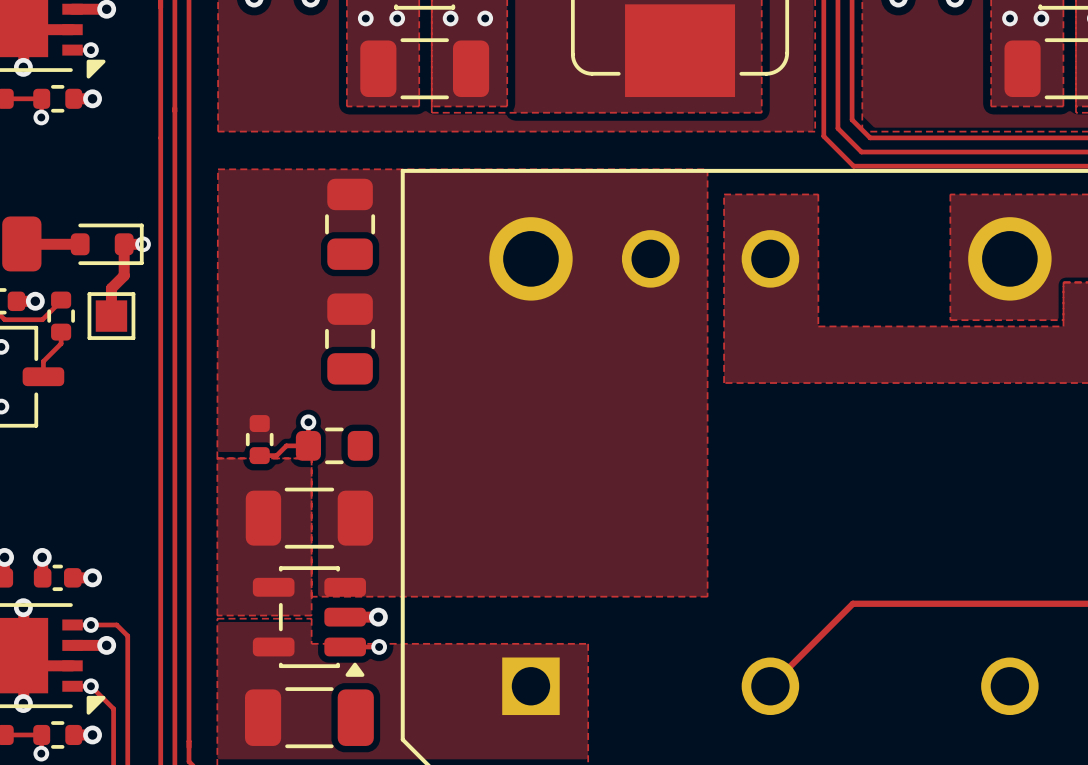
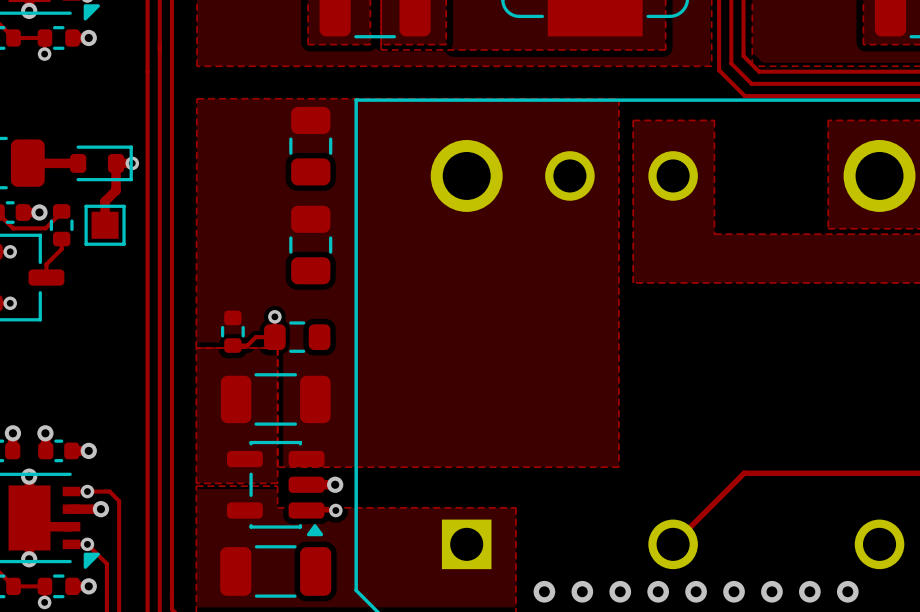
via: none -> (544, 591)
via: none -> (582, 591)
via: none -> (620, 591)
via: none -> (658, 591)
via: none -> (696, 591)
via: none -> (734, 591)
via: none -> (771, 591)
via: none -> (809, 591)
via: none -> (847, 591)

